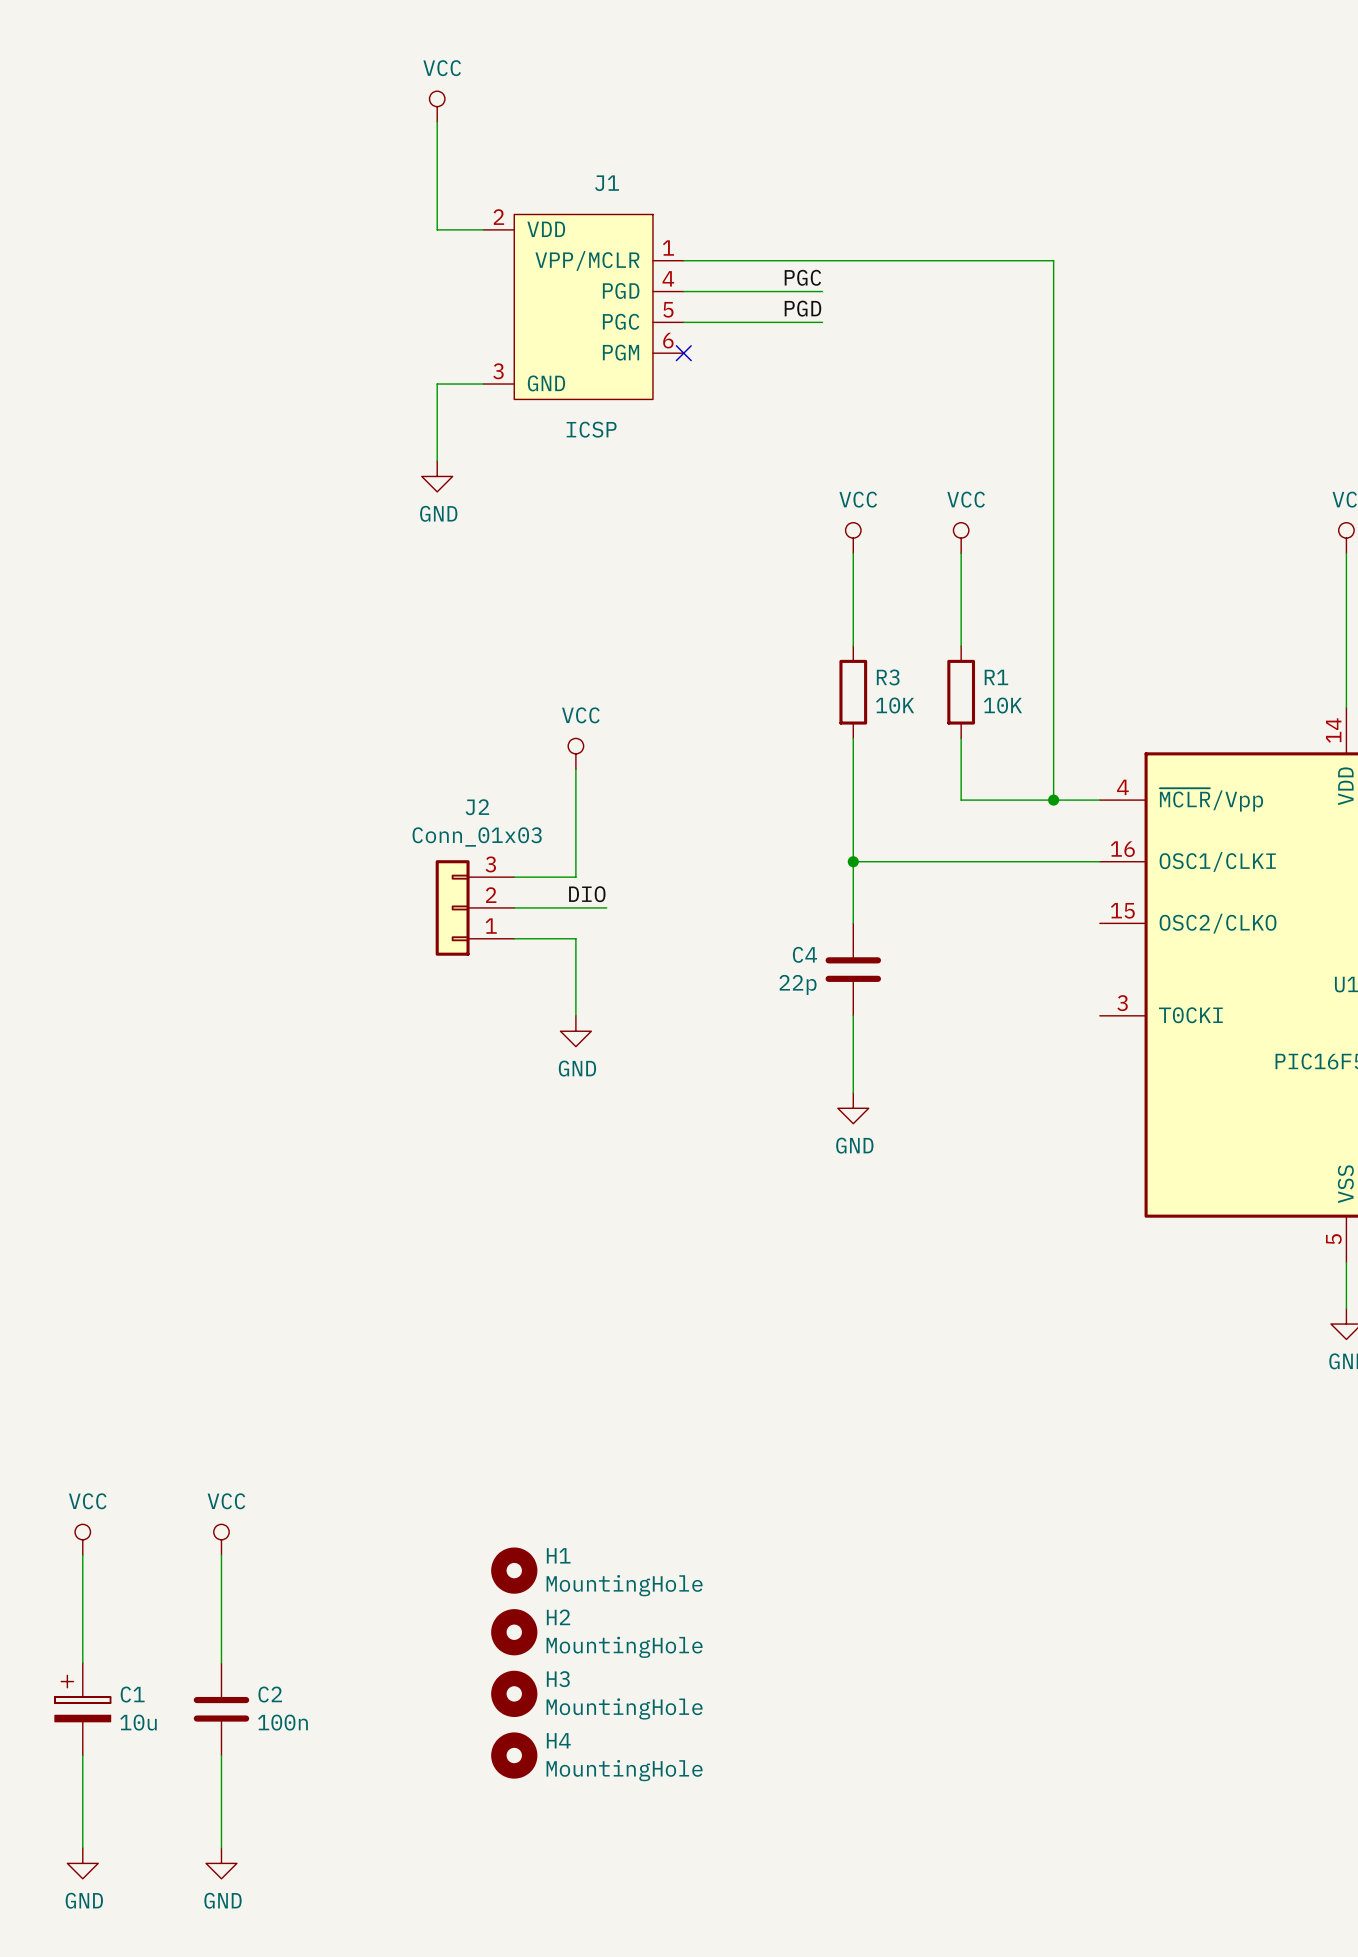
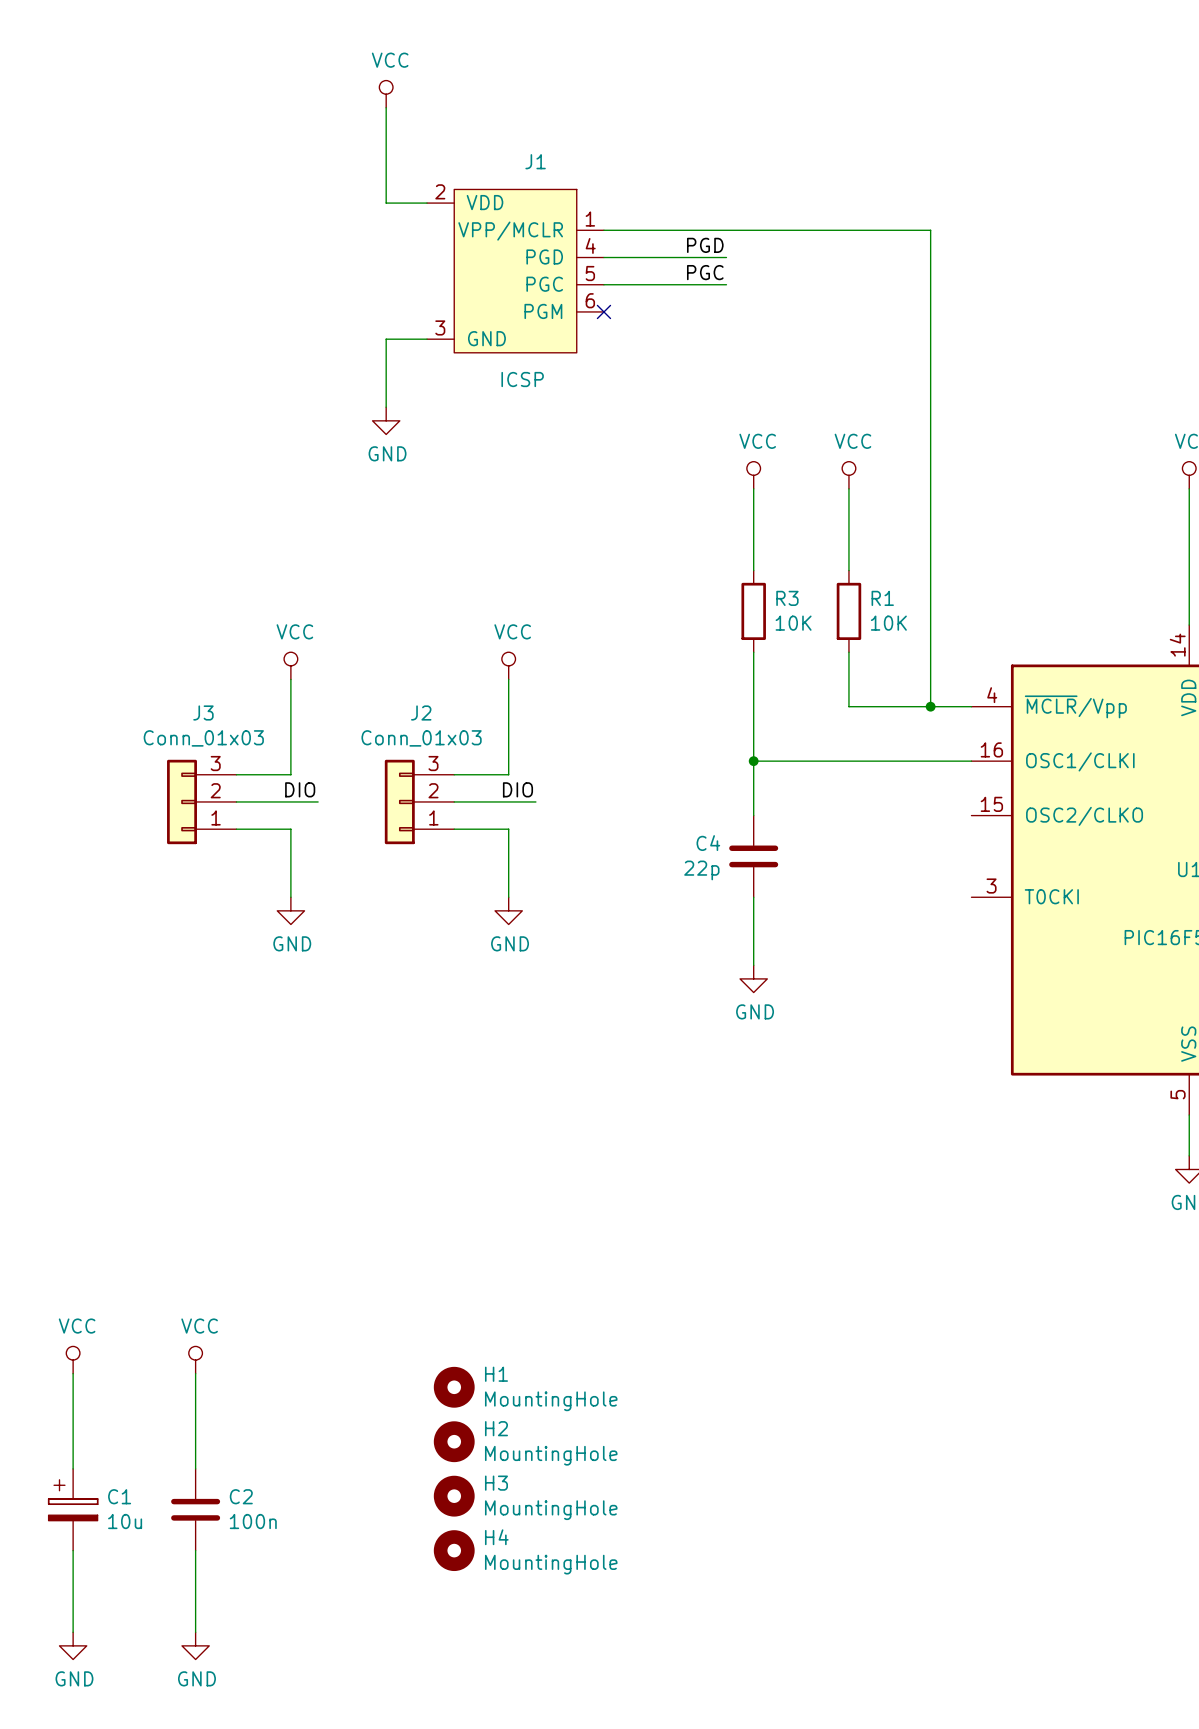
label: PGC (802, 277) -> PGD (705, 245)
label: PGD (802, 308) -> PGC (705, 272)
power symbol: none -> VCC (290, 665)
wire: none -> (290, 679) (290, 774) (236, 774)
label: none -> DIO (300, 789)
J3: none -> Conn_01x03 (201, 801)
wire: none -> (236, 801) (318, 801)
wire: none -> (236, 829) (290, 829) (290, 897)
power symbol: none -> GND (290, 910)

